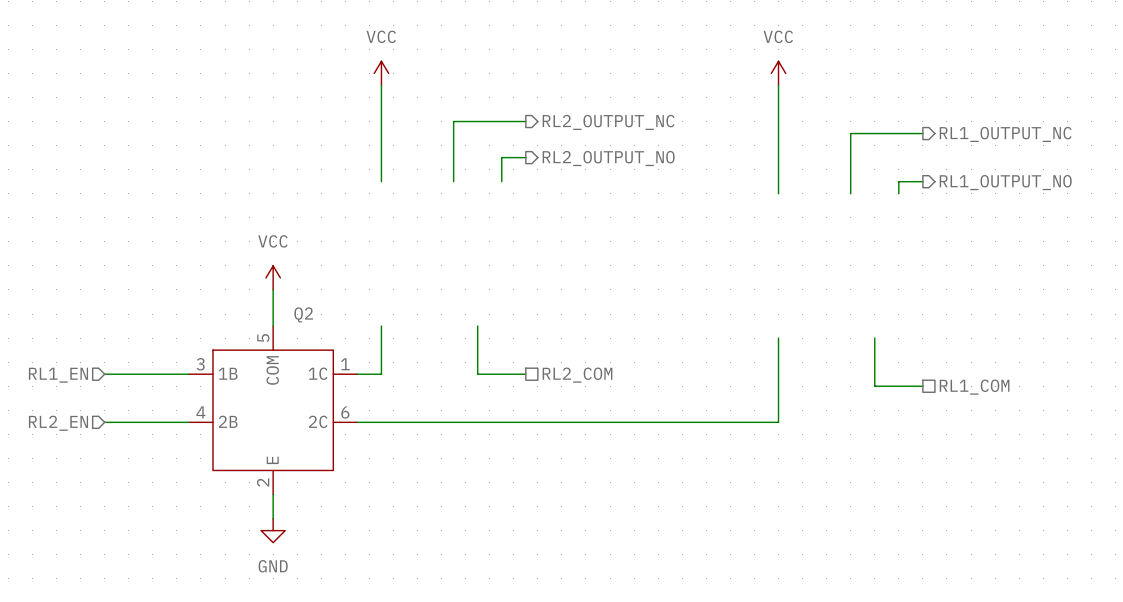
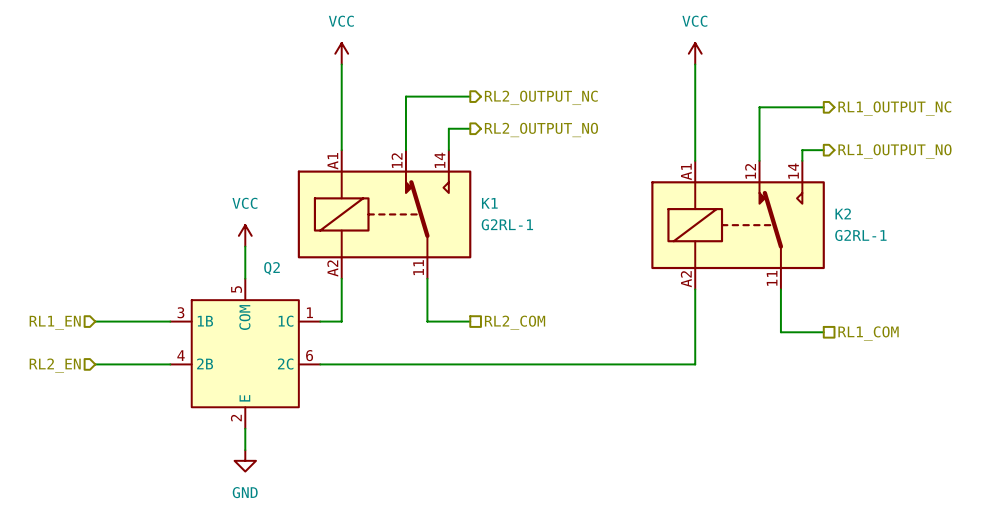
K1: none -> G2RL-1 (384, 214)
K2: none -> G2RL-1 (738, 225)

